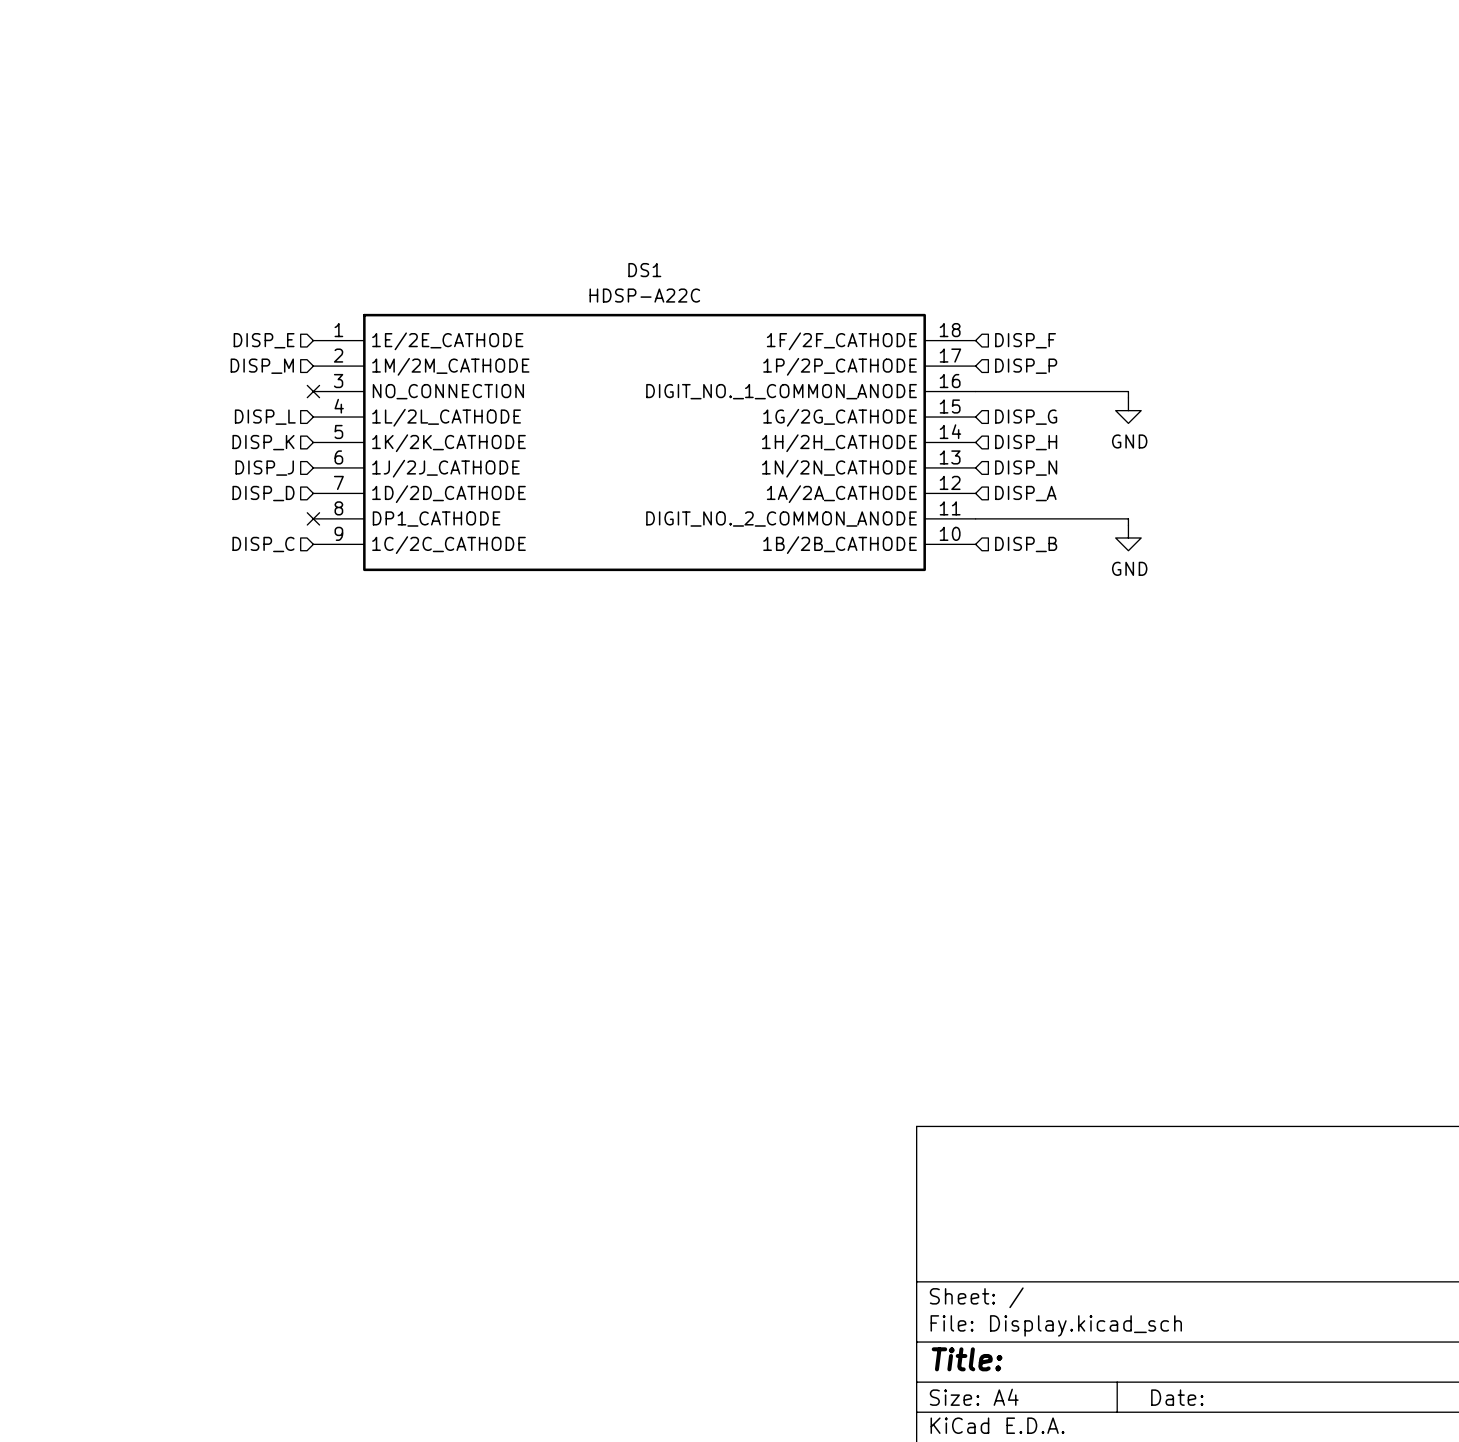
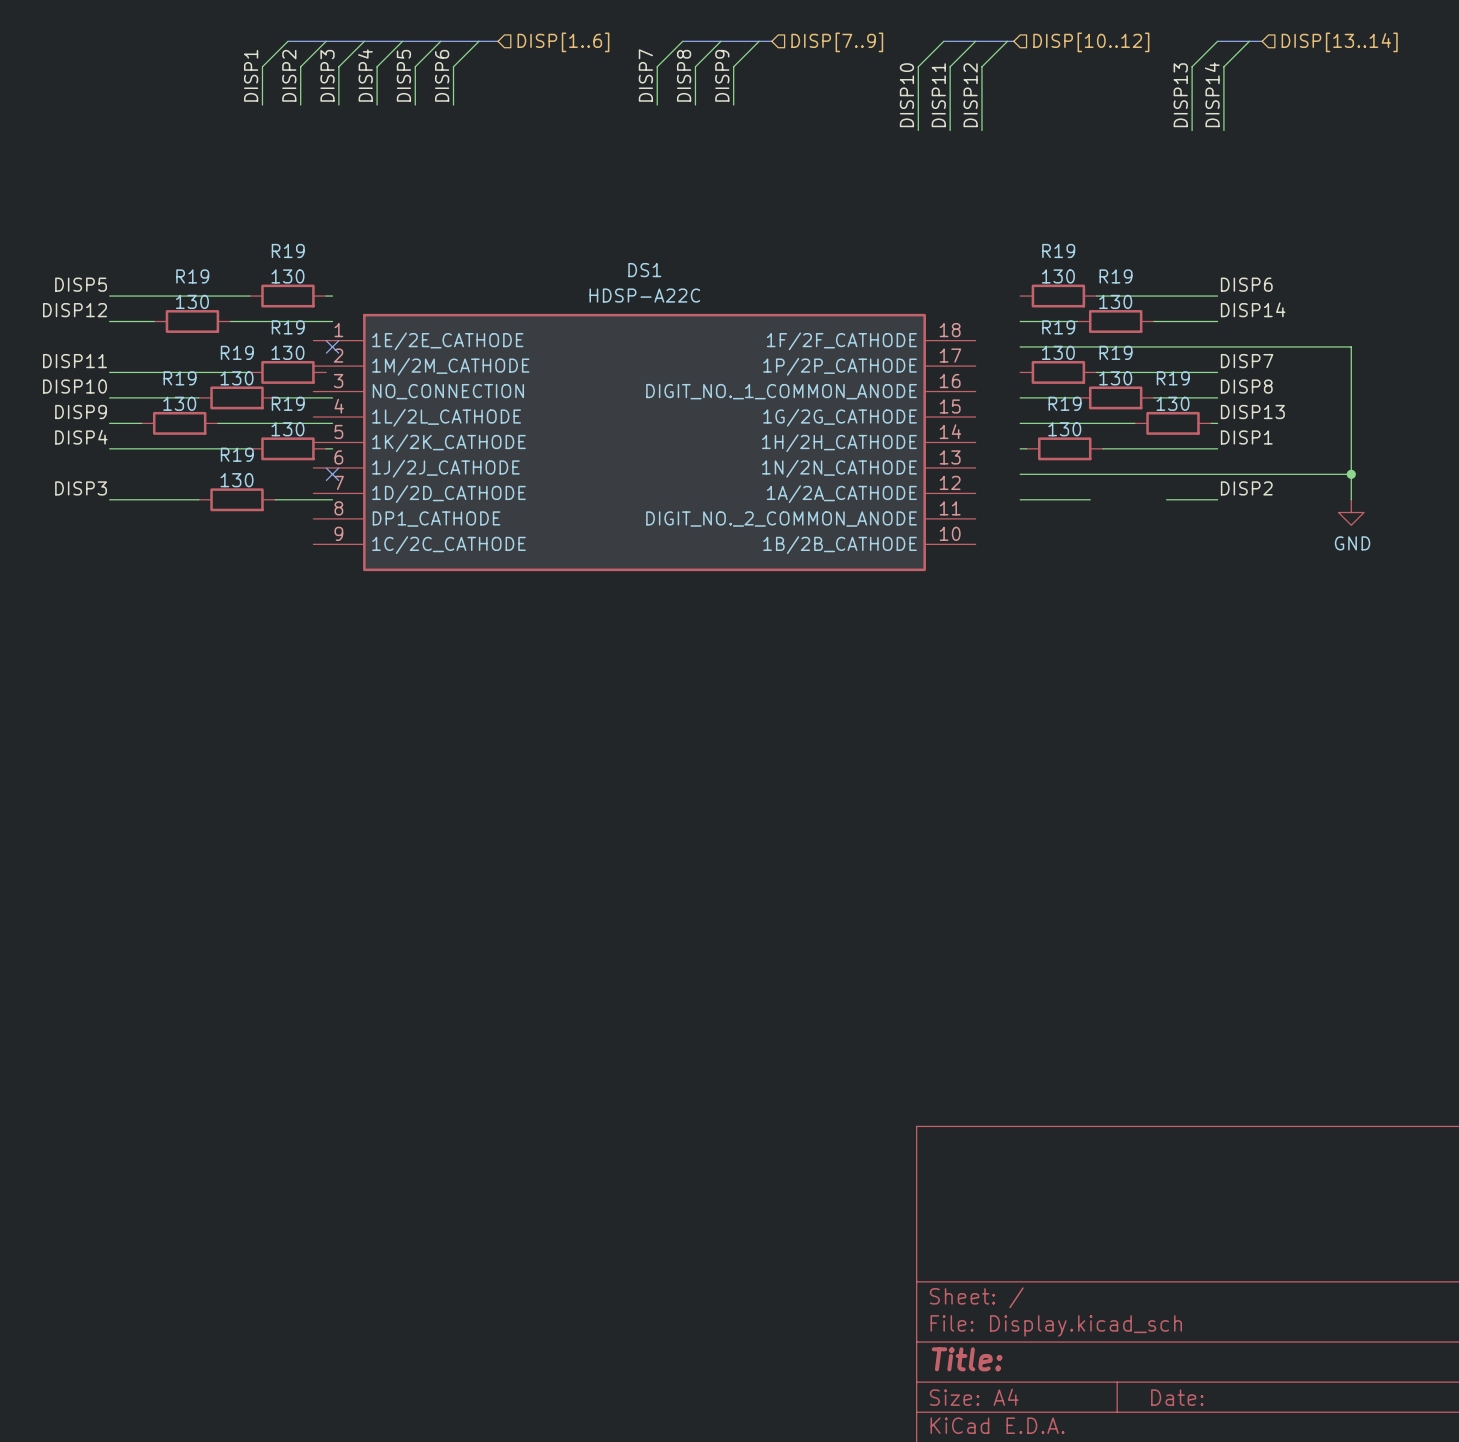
wire: none -> (287, 41) (262, 66)
bus: none -> (287, 41) (498, 41)
wire: none -> (326, 41) (300, 66)
wire: none -> (364, 41) (338, 66)
wire: none -> (402, 41) (377, 66)
wire: none -> (440, 41) (415, 66)
wire: none -> (478, 41) (453, 66)
wire: none -> (682, 41) (657, 66)
bus: none -> (682, 41) (771, 41)
wire: none -> (720, 41) (695, 66)
wire: none -> (759, 41) (733, 66)
wire: none -> (943, 41) (918, 66)
bus: none -> (943, 41) (1013, 41)
wire: none -> (975, 41) (950, 66)
wire: none -> (1007, 41) (981, 66)
wire: none -> (1217, 41) (1192, 66)
bus: none -> (1217, 41) (1262, 41)
wire: none -> (1249, 41) (1223, 66)
hierarchical label: none -> DISP[1..6] (563, 42)
hierarchical label: none -> DISP[7..9] (837, 42)
hierarchical label: none -> DISP[10..12] (1091, 42)
hierarchical label: none -> DISP[13..14] (1339, 42)
wire: none -> (262, 66) (262, 105)
wire: none -> (300, 66) (300, 105)
wire: none -> (338, 66) (338, 105)
wire: none -> (377, 66) (377, 105)
wire: none -> (415, 66) (415, 105)
wire: none -> (453, 66) (453, 105)
wire: none -> (657, 66) (657, 105)
wire: none -> (695, 66) (695, 105)
wire: none -> (733, 66) (733, 105)
wire: none -> (918, 66) (918, 130)
wire: none -> (950, 66) (950, 130)
wire: none -> (981, 66) (981, 130)
wire: none -> (1192, 66) (1192, 130)
wire: none -> (1223, 66) (1223, 130)
label: none -> DISP1 (251, 75)
label: none -> DISP2 (289, 75)
label: none -> DISP3 (327, 75)
label: none -> DISP4 (365, 75)
label: none -> DISP5 (403, 75)
label: none -> DISP6 (442, 75)
label: none -> DISP7 (645, 75)
label: none -> DISP8 (684, 75)
label: none -> DISP9 (722, 75)
label: none -> DISP14 (1212, 94)
label: none -> DISP10 (906, 95)
label: none -> DISP11 (938, 95)
label: none -> DISP12 (970, 95)
label: none -> DISP13 (1180, 95)
label: none -> DISP5 (81, 284)
label: none -> DISP6 (1246, 284)
wire: none -> (109, 296) (249, 296)
R19: none -> 130 (287, 296)
wire: none -> (326, 296) (332, 296)
R19: none -> 130 (1058, 296)
wire: none -> (1096, 296) (1217, 296)
label: none -> DISP14 (1253, 309)
label: none -> DISP12 (75, 310)
wire: none -> (109, 321) (154, 321)
R19: none -> 130 (192, 321)
wire: none -> (230, 321) (332, 321)
wire: none -> (1020, 321) (1077, 321)
R19: none -> 130 (1115, 321)
wire: none -> (1153, 321) (1217, 321)
hierarchical label: DISP_E (264, 340) -> none
hierarchical label: DISP_F (1025, 340) -> none
no-connect mark: none -> (332, 346)
wire: none -> (1020, 346) (1351, 346) (1351, 499)
label: none -> DISP11 (75, 361)
label: none -> DISP7 (1247, 361)
hierarchical label: DISP_M (262, 366) -> none
hierarchical label: DISP_P (1026, 366) -> none
wire: none -> (109, 372) (249, 372)
R19: none -> 130 (287, 372)
R19: none -> 130 (1058, 372)
wire: none -> (1096, 372) (1217, 372)
label: none -> DISP10 (75, 386)
label: none -> DISP8 (1246, 386)
no-connect mark: (313, 391) -> none
wire: (975, 391) (1128, 391) (1128, 397) -> none
wire: none -> (109, 397) (198, 397)
R19: none -> 130 (237, 397)
wire: none -> (275, 397) (332, 397)
wire: none -> (1020, 397) (1077, 397)
R19: none -> 130 (1115, 397)
wire: none -> (1153, 397) (1217, 397)
power symbol: GND (1128, 410) -> none
label: none -> DISP9 (81, 412)
label: none -> DISP13 (1252, 412)
hierarchical label: DISP_L (265, 417) -> none
hierarchical label: DISP_G (1026, 417) -> none
wire: none -> (109, 423) (141, 423)
R19: none -> 130 (179, 423)
wire: none -> (217, 423) (332, 423)
wire: none -> (1020, 423) (1134, 423)
R19: none -> 130 (1173, 423)
wire: none -> (1211, 423) (1217, 423)
label: none -> DISP4 (81, 437)
label: none -> DISP1 (1246, 437)
hierarchical label: DISP_K (263, 442) -> none
hierarchical label: DISP_H (1026, 442) -> none
wire: none -> (109, 448) (249, 448)
R19: none -> 130 (287, 448)
wire: none -> (326, 448) (332, 448)
wire: none -> (1020, 448) (1026, 448)
R19: none -> 130 (1064, 448)
wire: none -> (1102, 448) (1217, 448)
hierarchical label: DISP_J (264, 468) -> none
hierarchical label: DISP_N (1026, 468) -> none
no-connect mark: none -> (332, 474)
wire: none -> (1020, 474) (1351, 474)
junction: none -> (1351, 474)
label: none -> DISP3 (81, 488)
label: none -> DISP2 (1246, 488)
hierarchical label: DISP_D (263, 493) -> none
hierarchical label: DISP_A (1025, 493) -> none
wire: none -> (109, 499) (198, 499)
R19: none -> 130 (237, 499)
wire: none -> (275, 499) (332, 499)
wire: none -> (1020, 499) (1090, 499)
wire: none -> (1166, 499) (1217, 499)
power symbol: none -> GND (1351, 512)
no-connect mark: (313, 518) -> none
wire: (975, 518) (1128, 518) (1128, 525) -> none
power symbol: GND (1128, 537) -> none
hierarchical label: DISP_C (263, 544) -> none
hierarchical label: DISP_B (1026, 544) -> none

